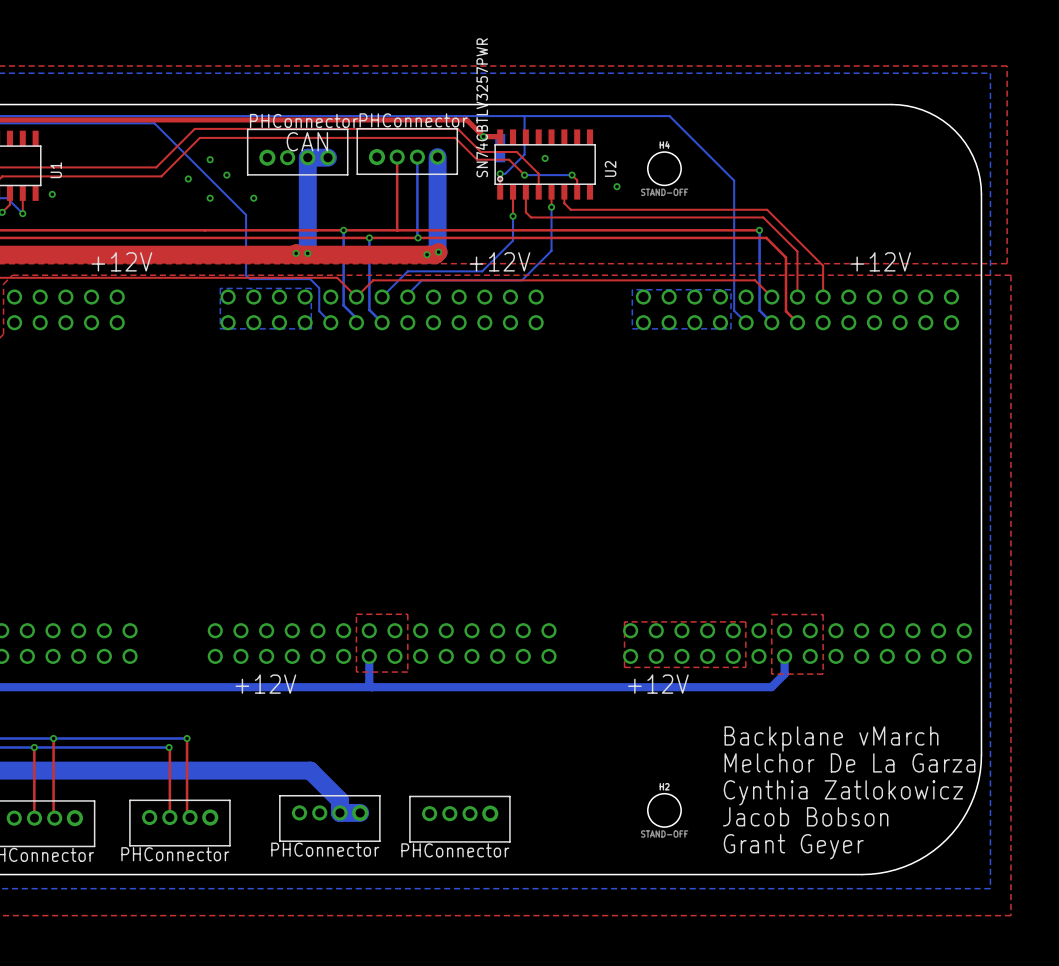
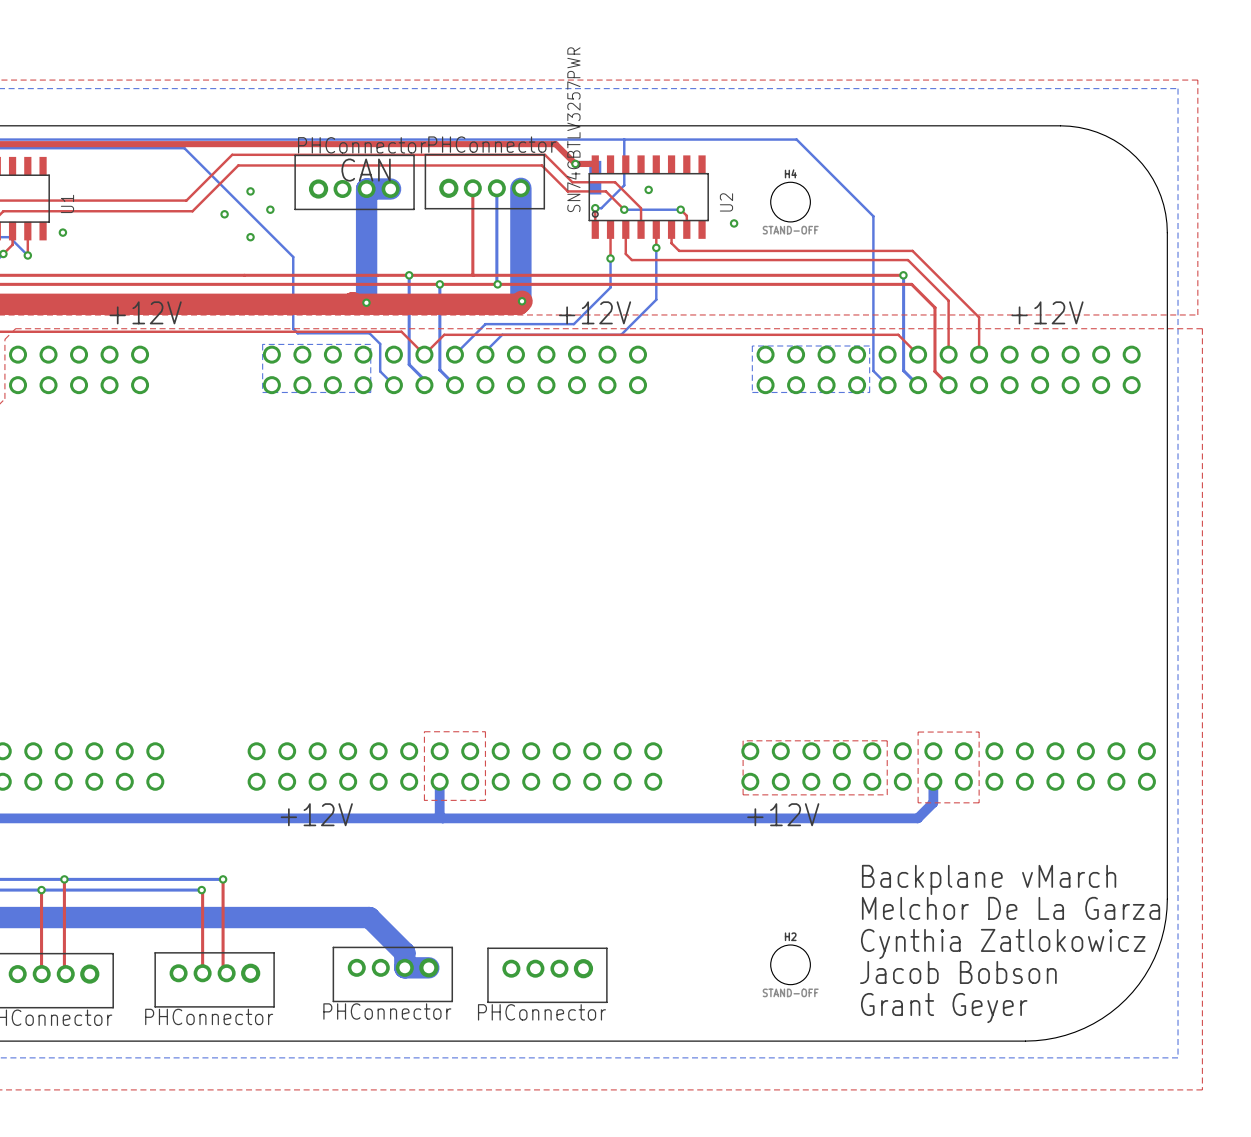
via: (253, 198) -> none
via: (296, 253) -> none
via: (427, 254) -> none

